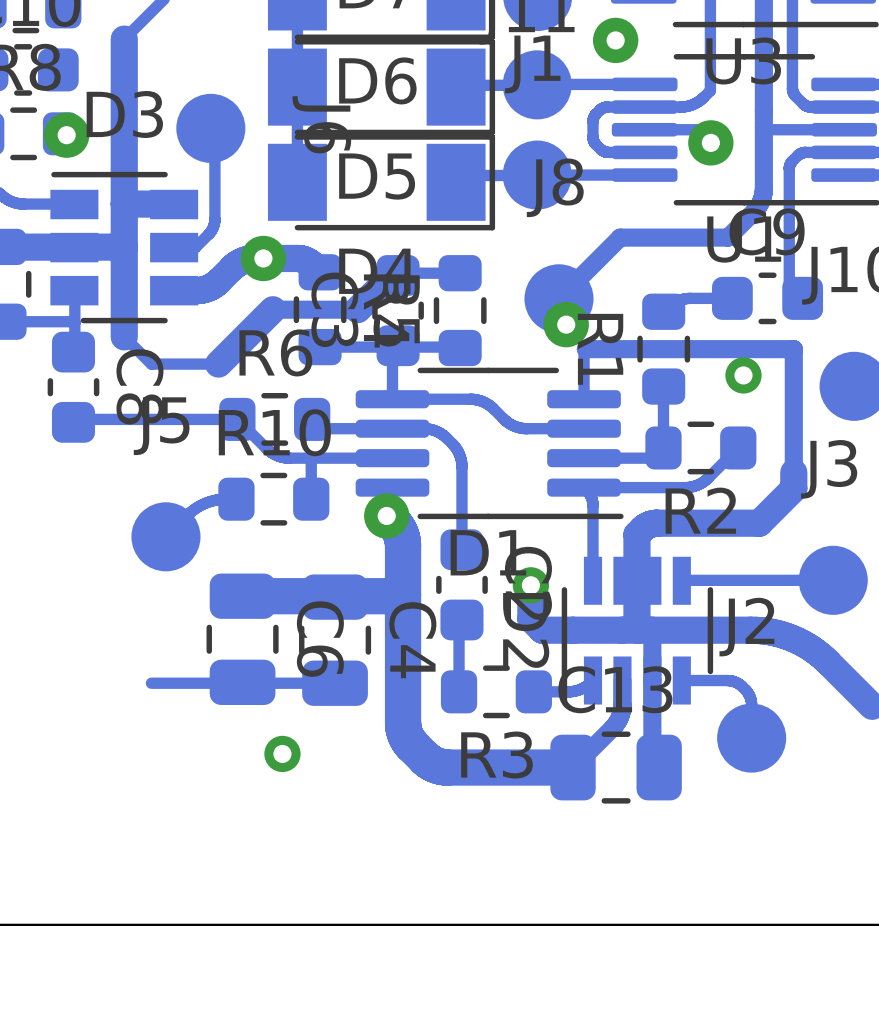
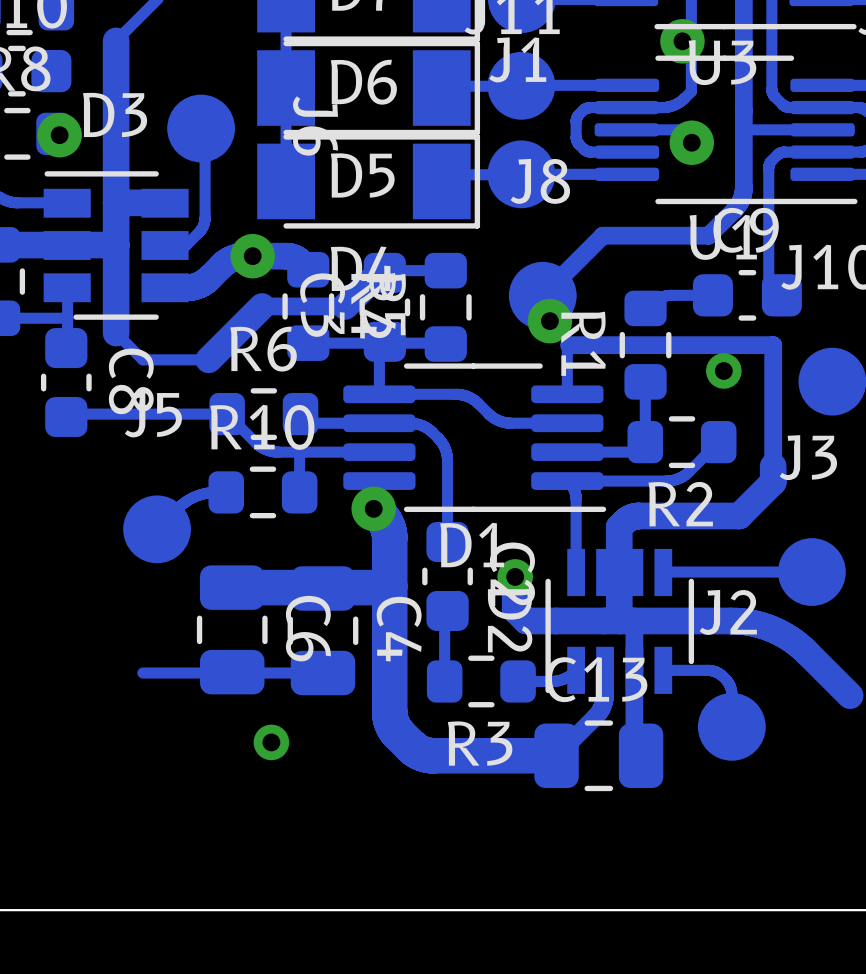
via position: (615, 40) -> (682, 41)

